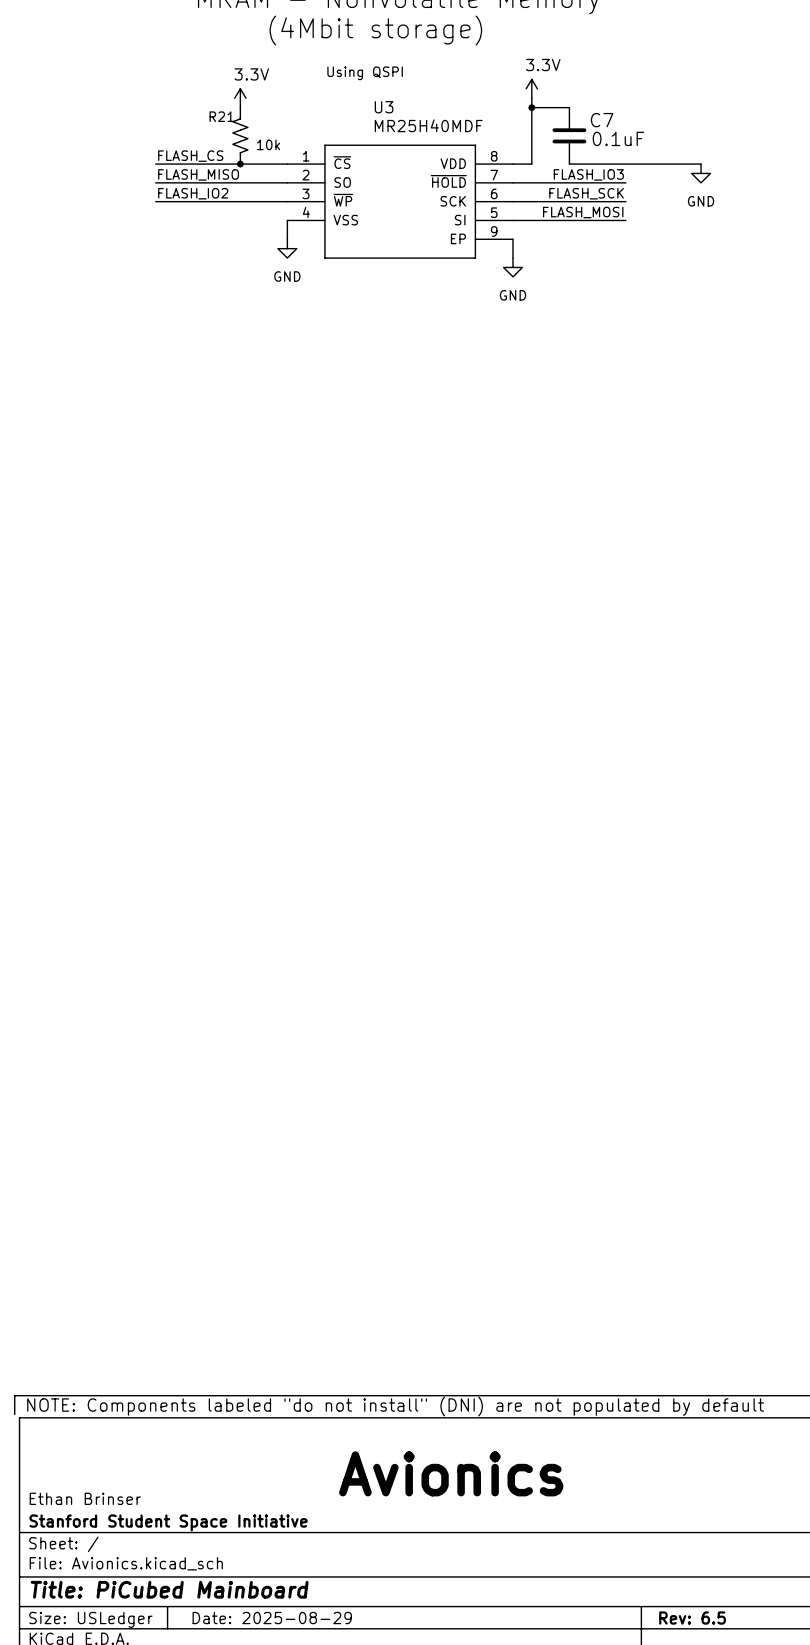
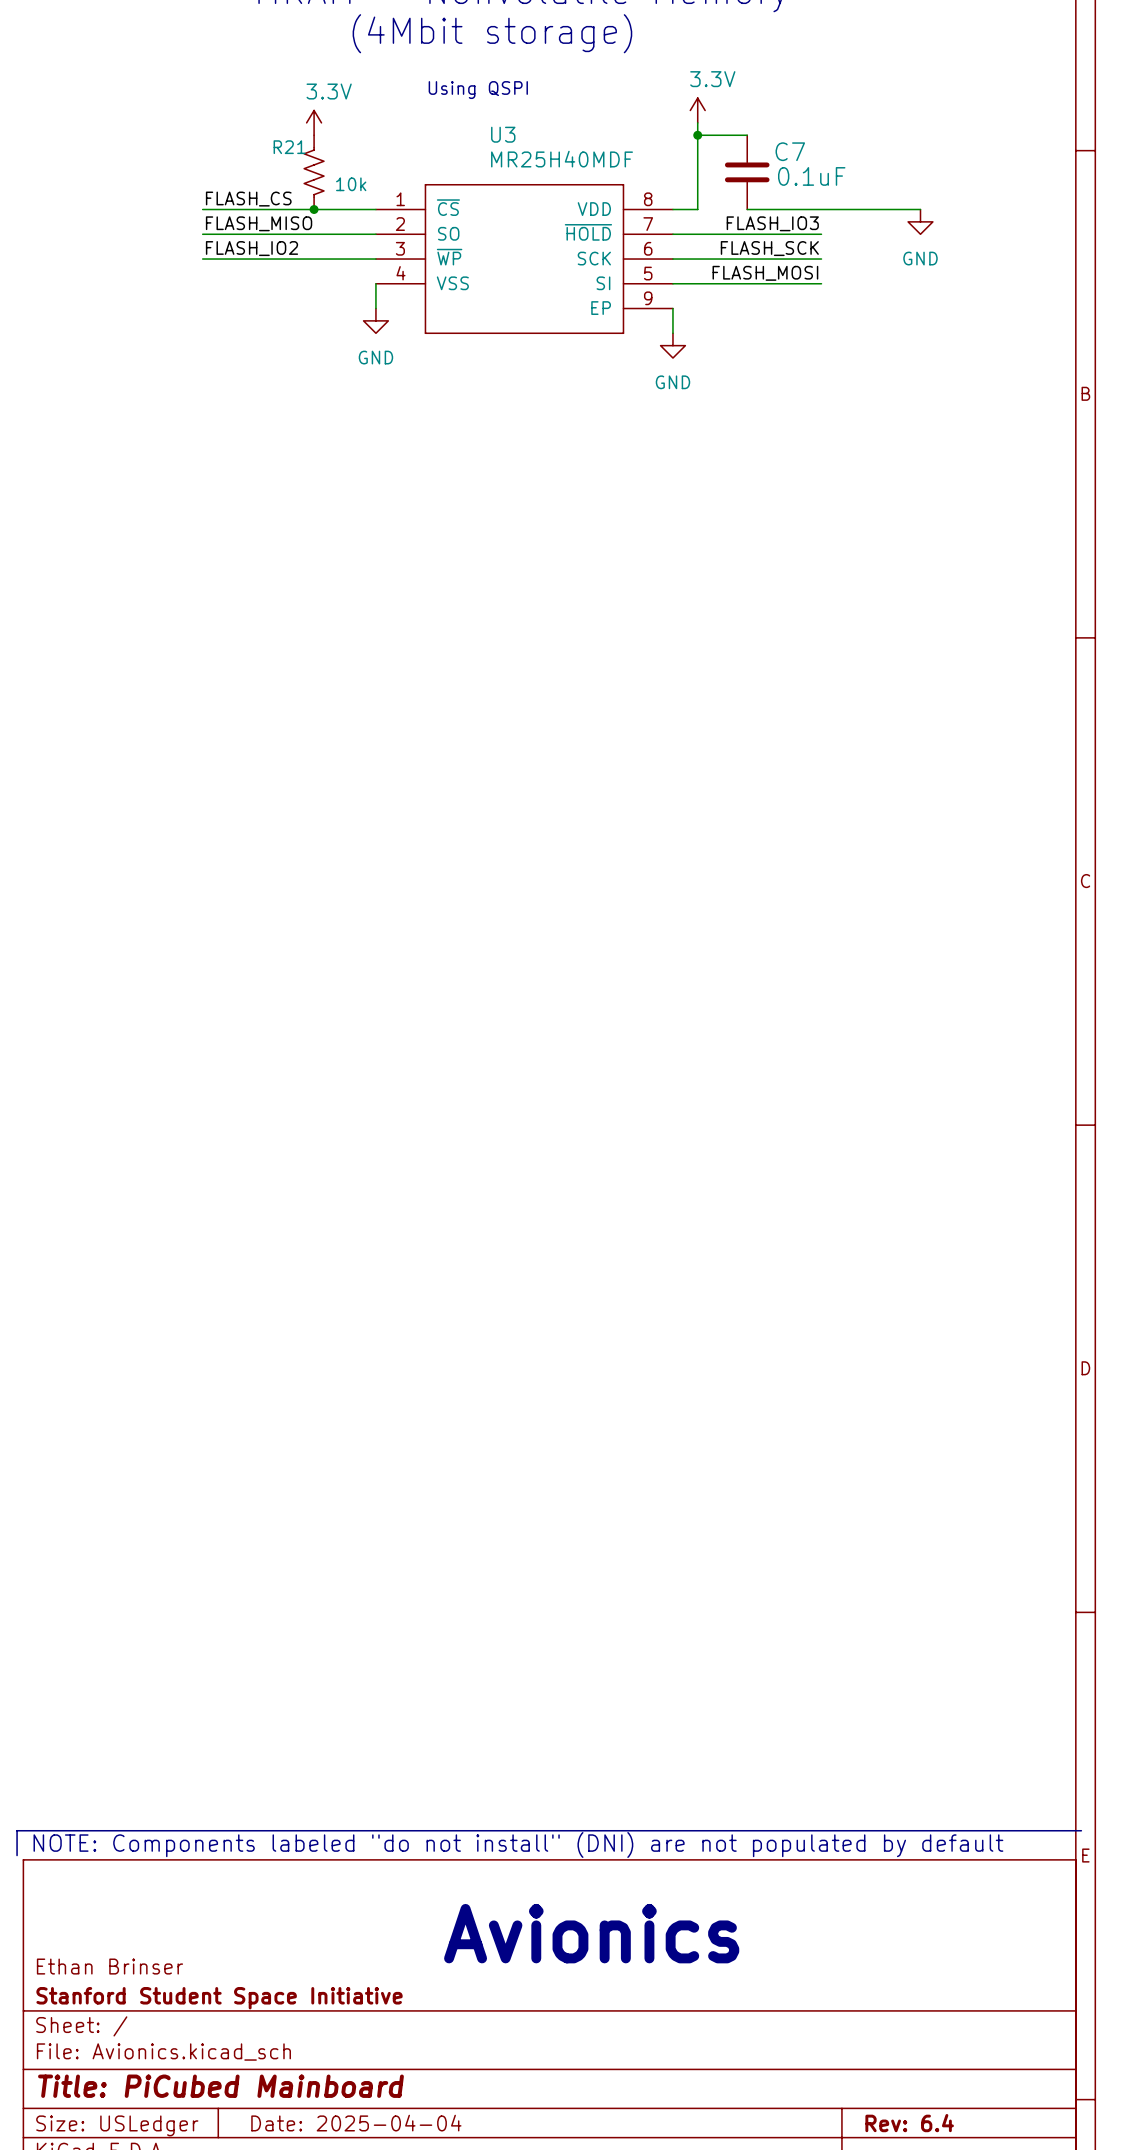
title block: Date: 2025-08-29 (272, 1618) -> Date: 2025-04-04 (356, 2123)
title block: Rev: 6.5 (692, 1618) -> Rev: 6.4 (909, 2123)

